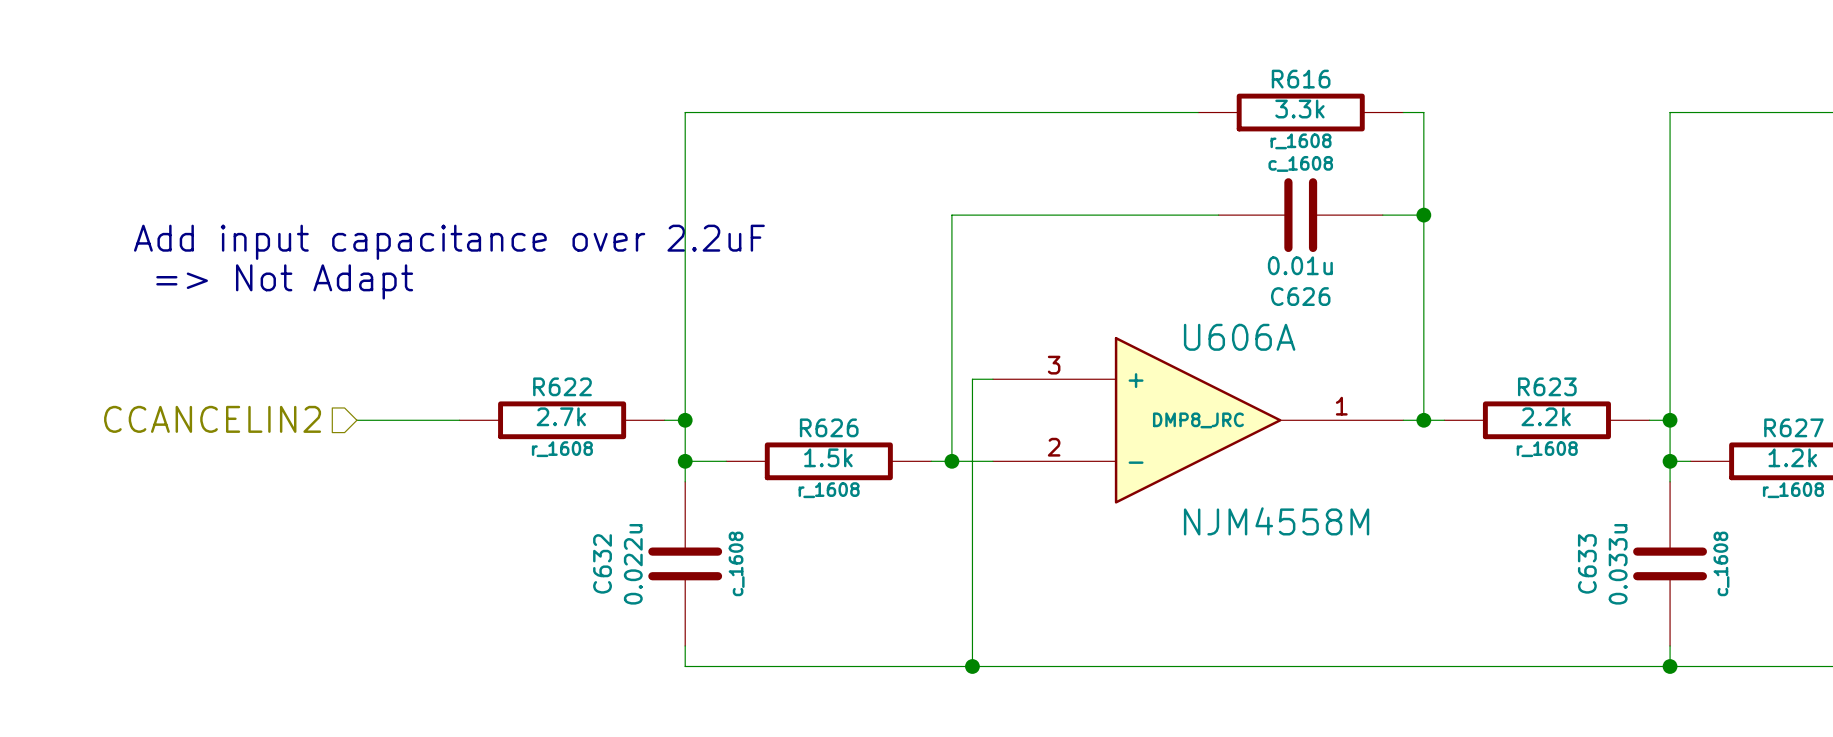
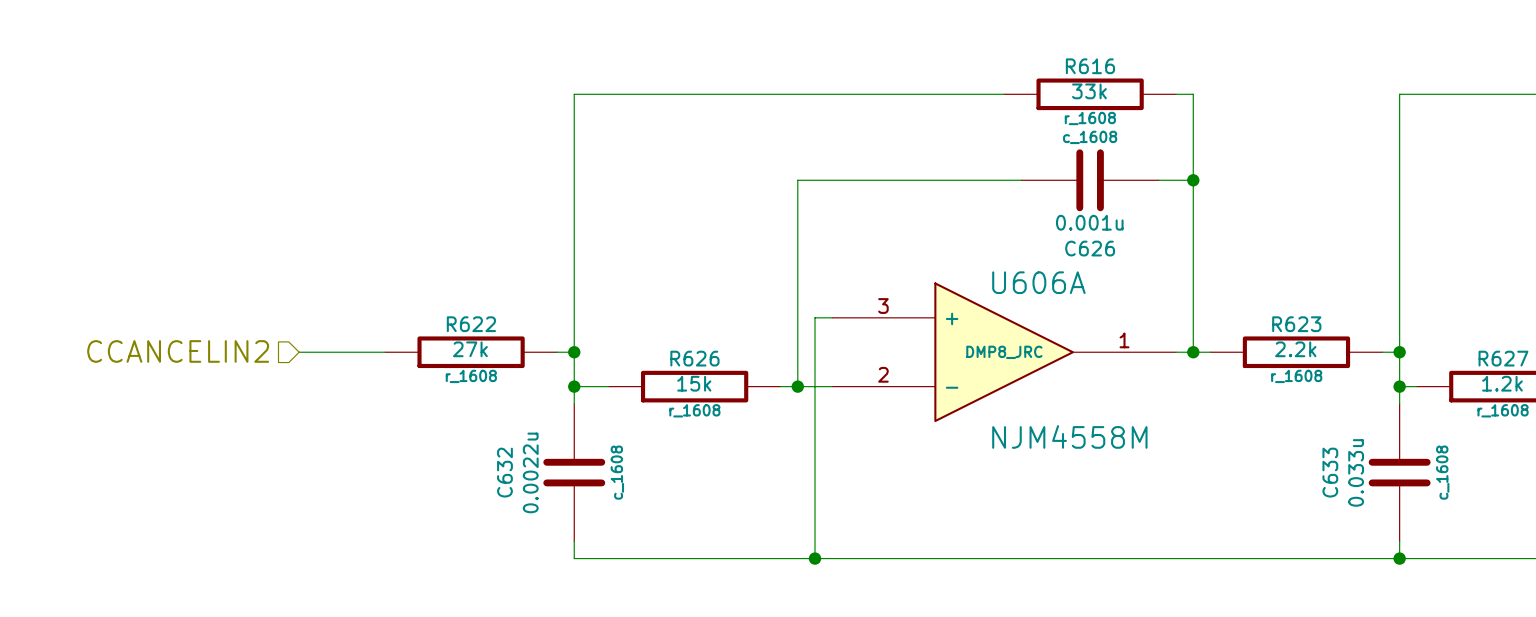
R616 value: 3.3k (1299, 109) -> 33k (1089, 91)
text: Add input capacitance over 2.2uF (449, 242) -> none
C626 value: 0.01u (1300, 265) -> 0.001u (1089, 222)
text: => Not Adapt (284, 281) -> none
R622 value: 2.7k (561, 416) -> 27k (470, 349)
R626 value: 1.5k (828, 457) -> 15k (694, 383)
C632 value: 0.022u (633, 564) -> 0.0022u (530, 472)

